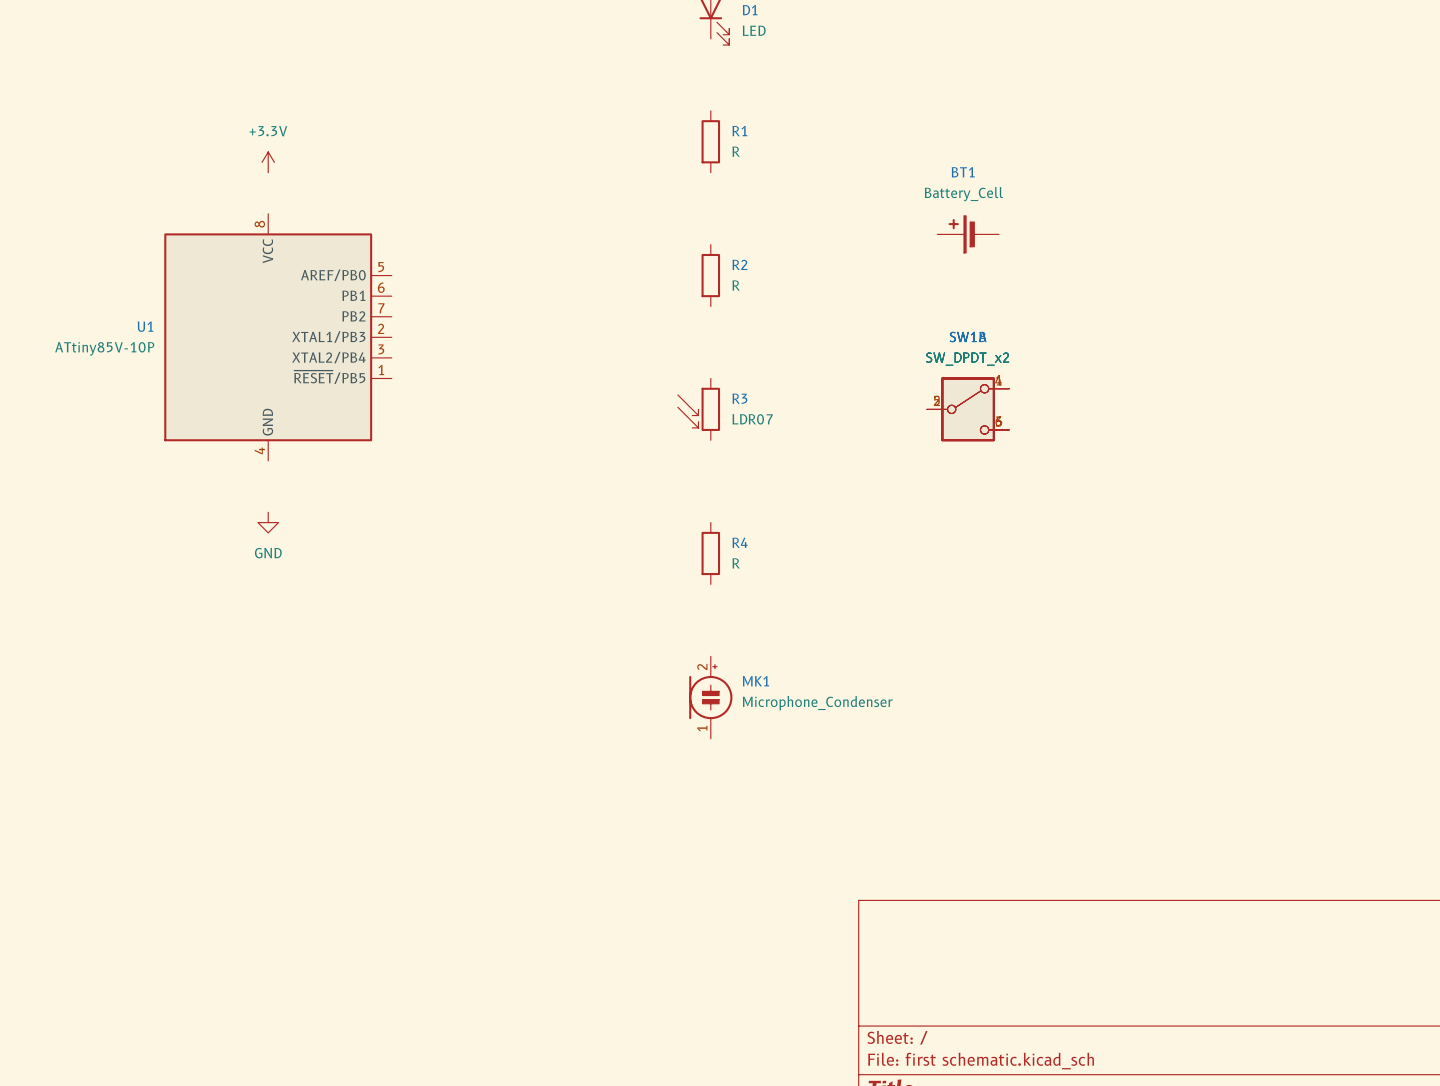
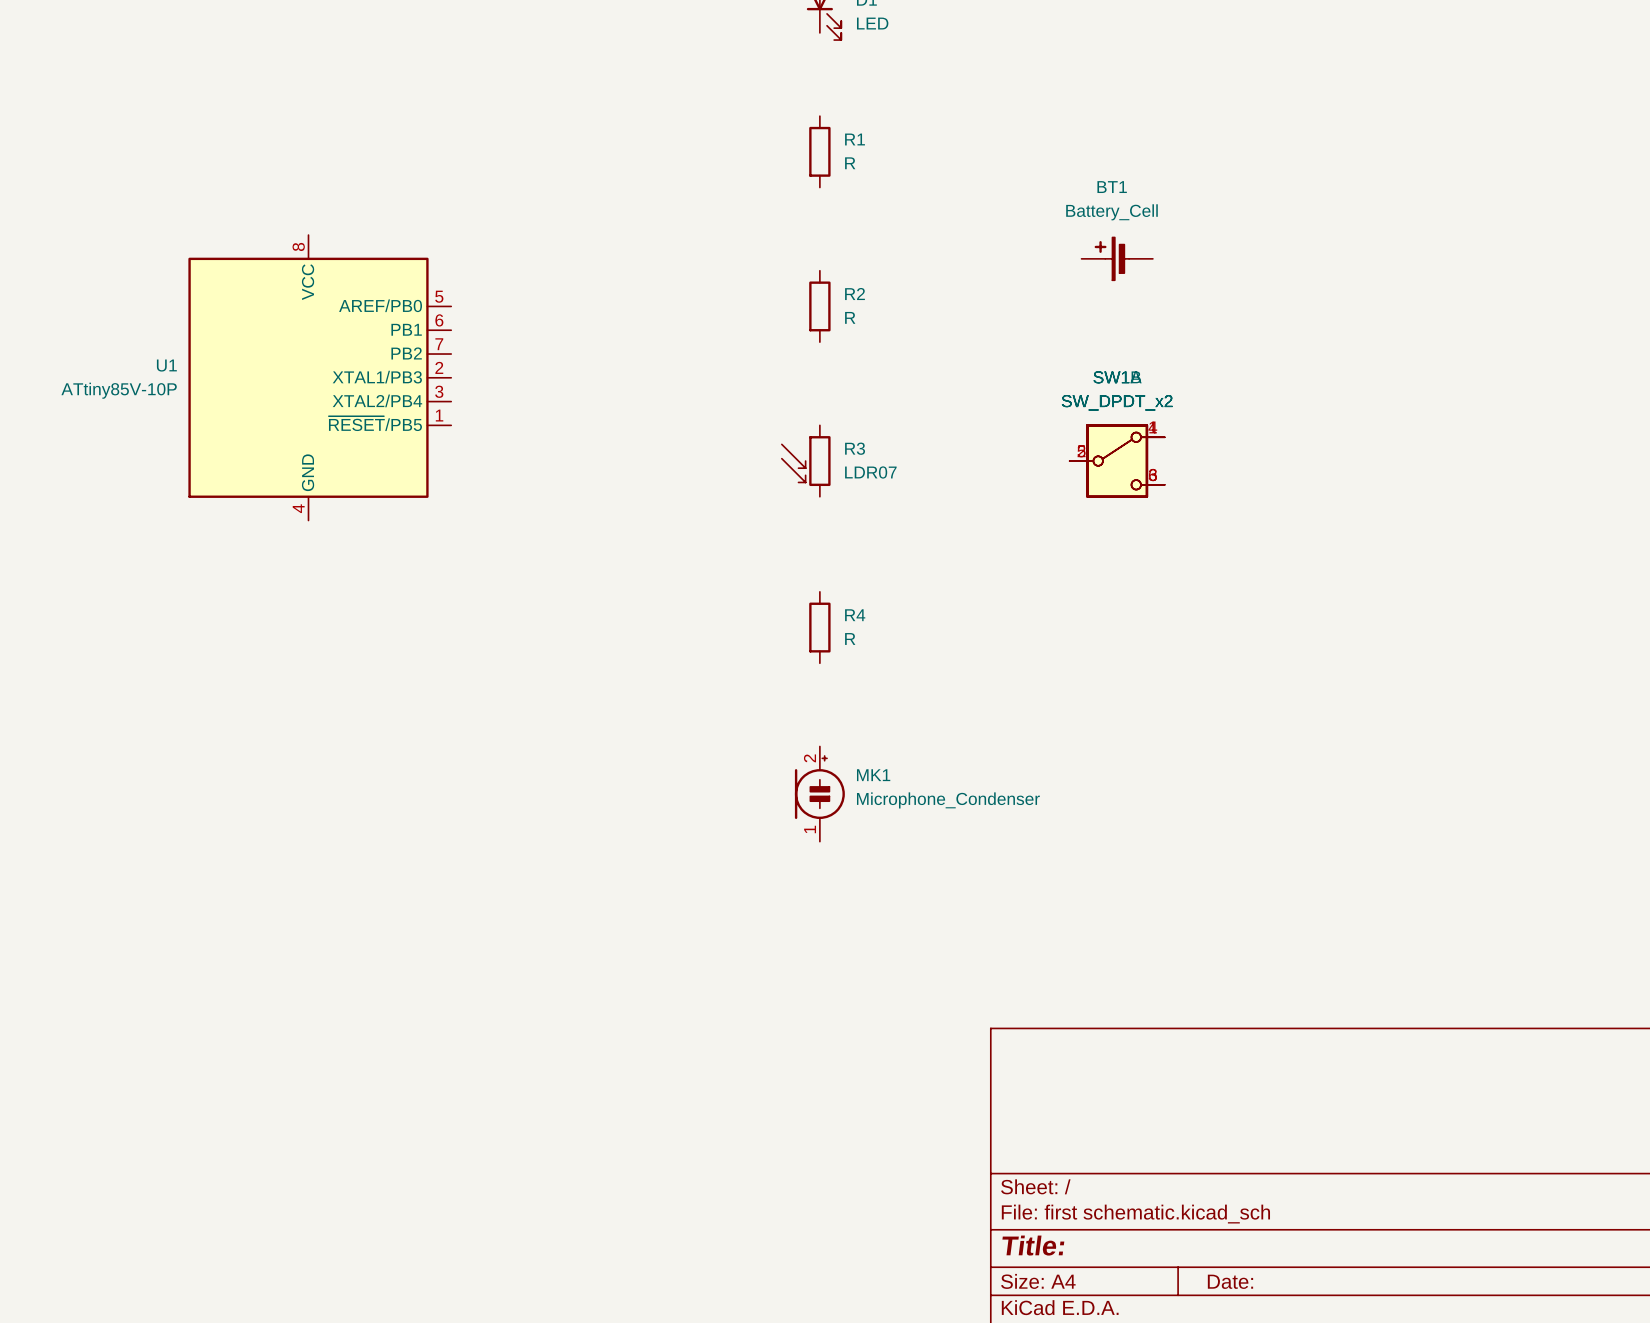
power symbol: +3.3V (268, 162) -> none
power symbol: GND (268, 522) -> none

